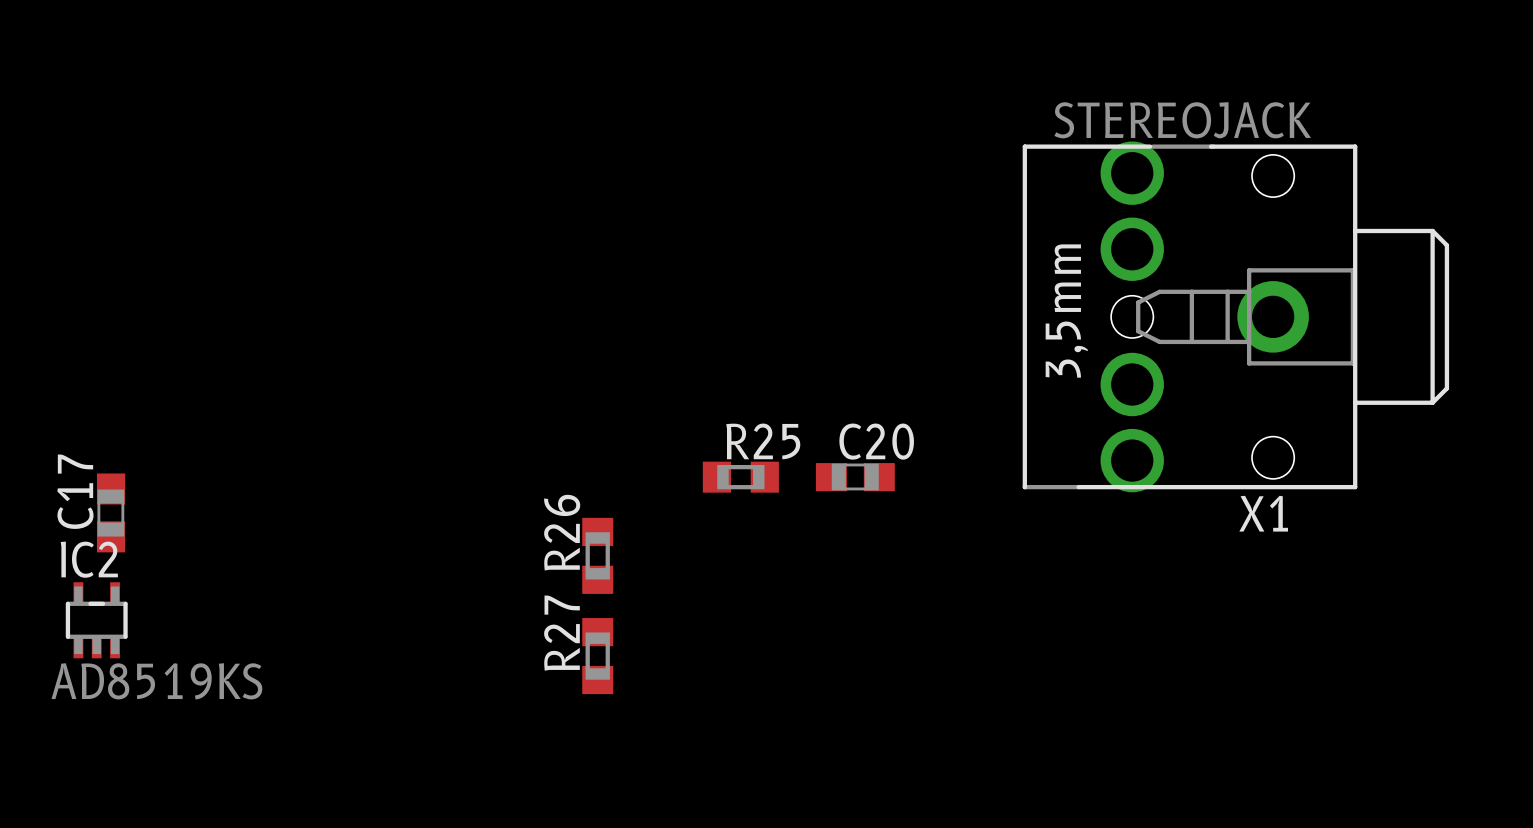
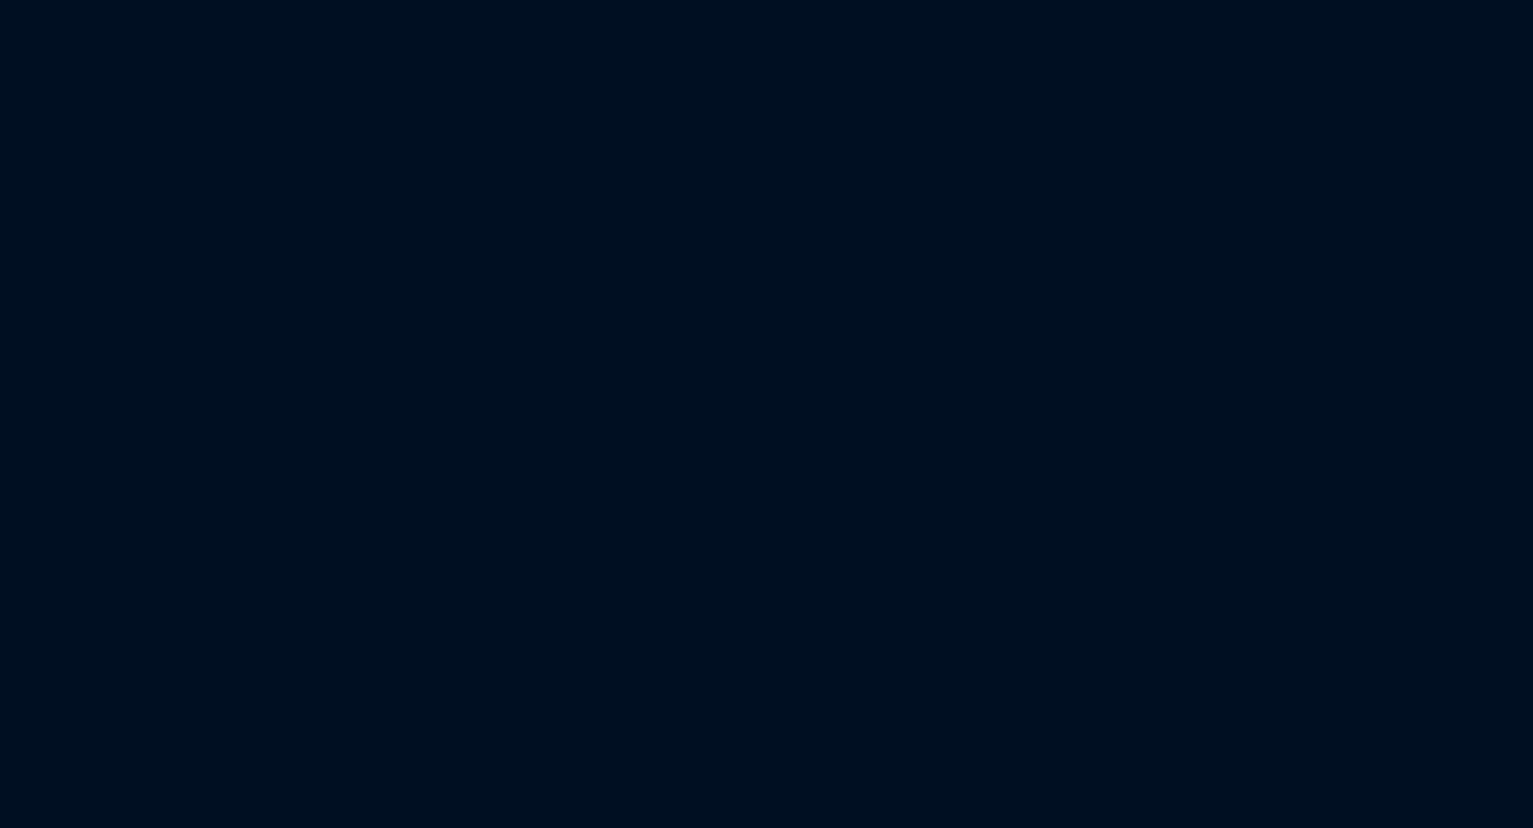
X1: STEREOJACK (1235, 316) -> none
R25: (740, 477) -> none
C20: (855, 477) -> none
C17: (111, 512) -> none
R26: (597, 555) -> none
IC2: AD8519KS (96, 620) -> none
R27: (597, 656) -> none

